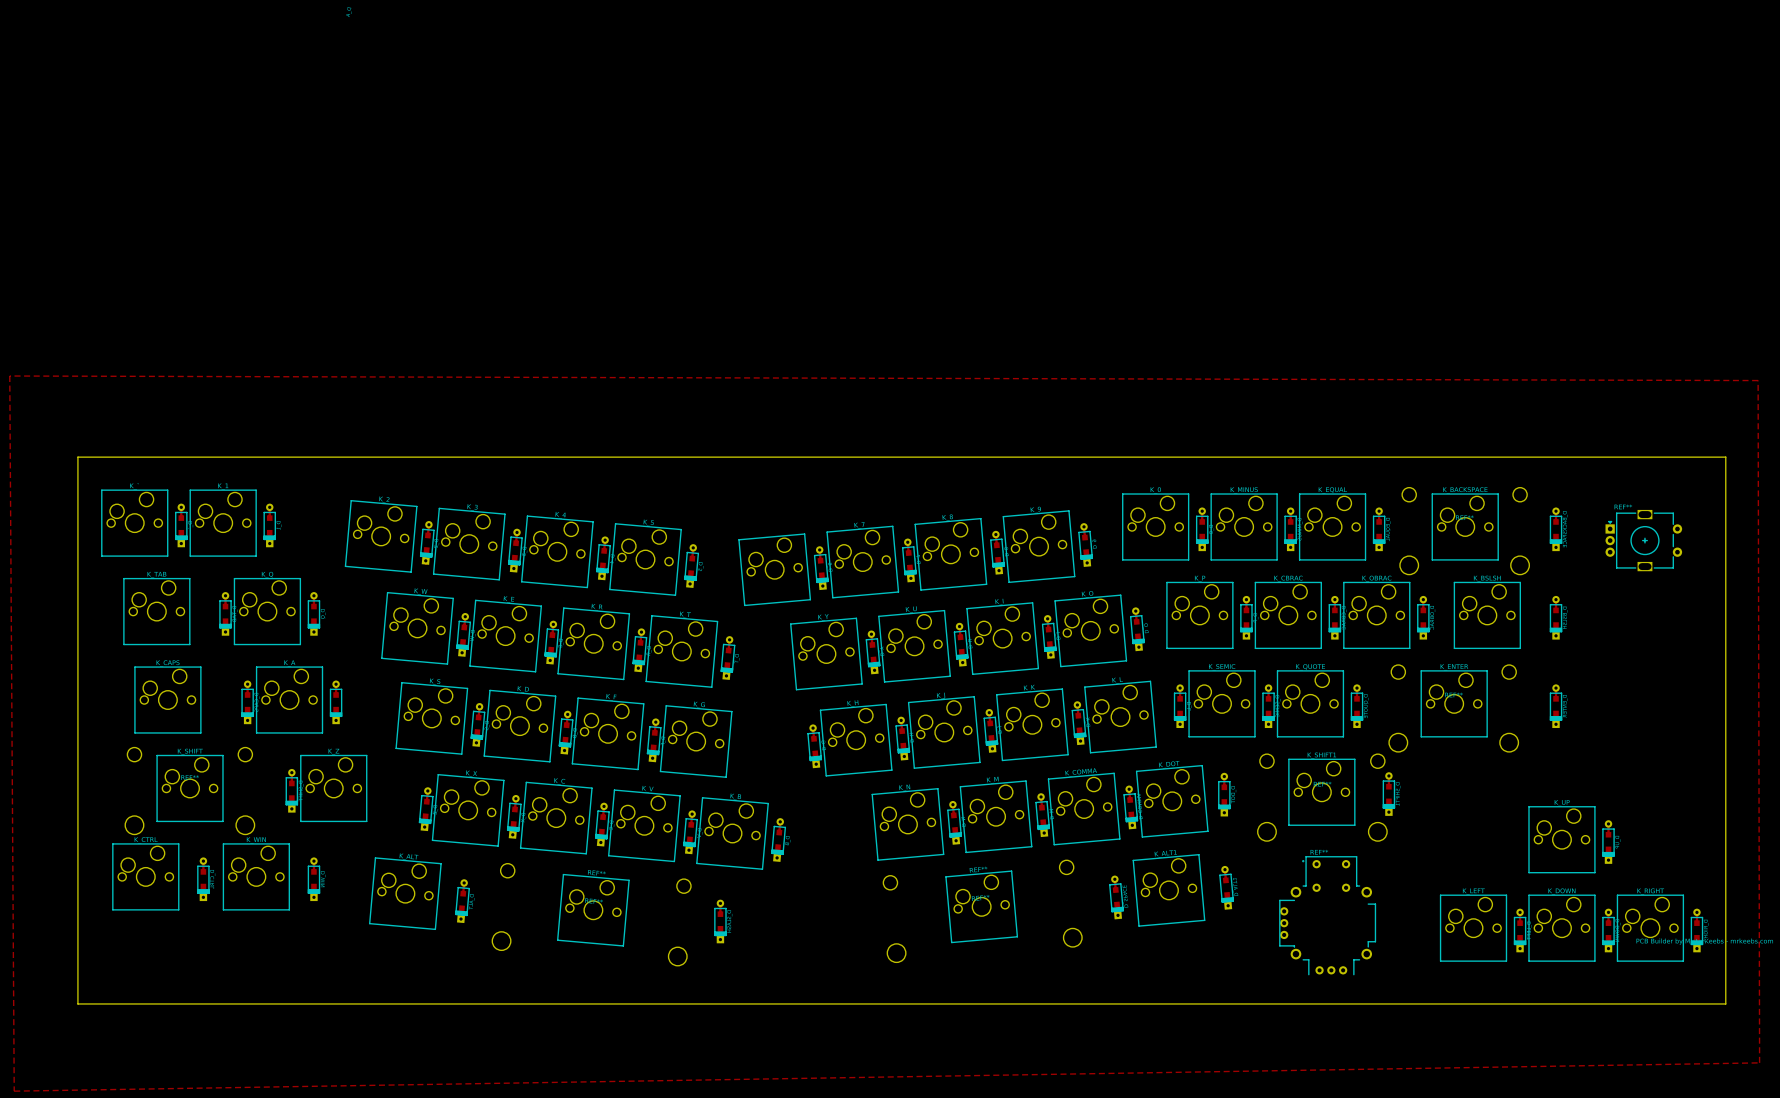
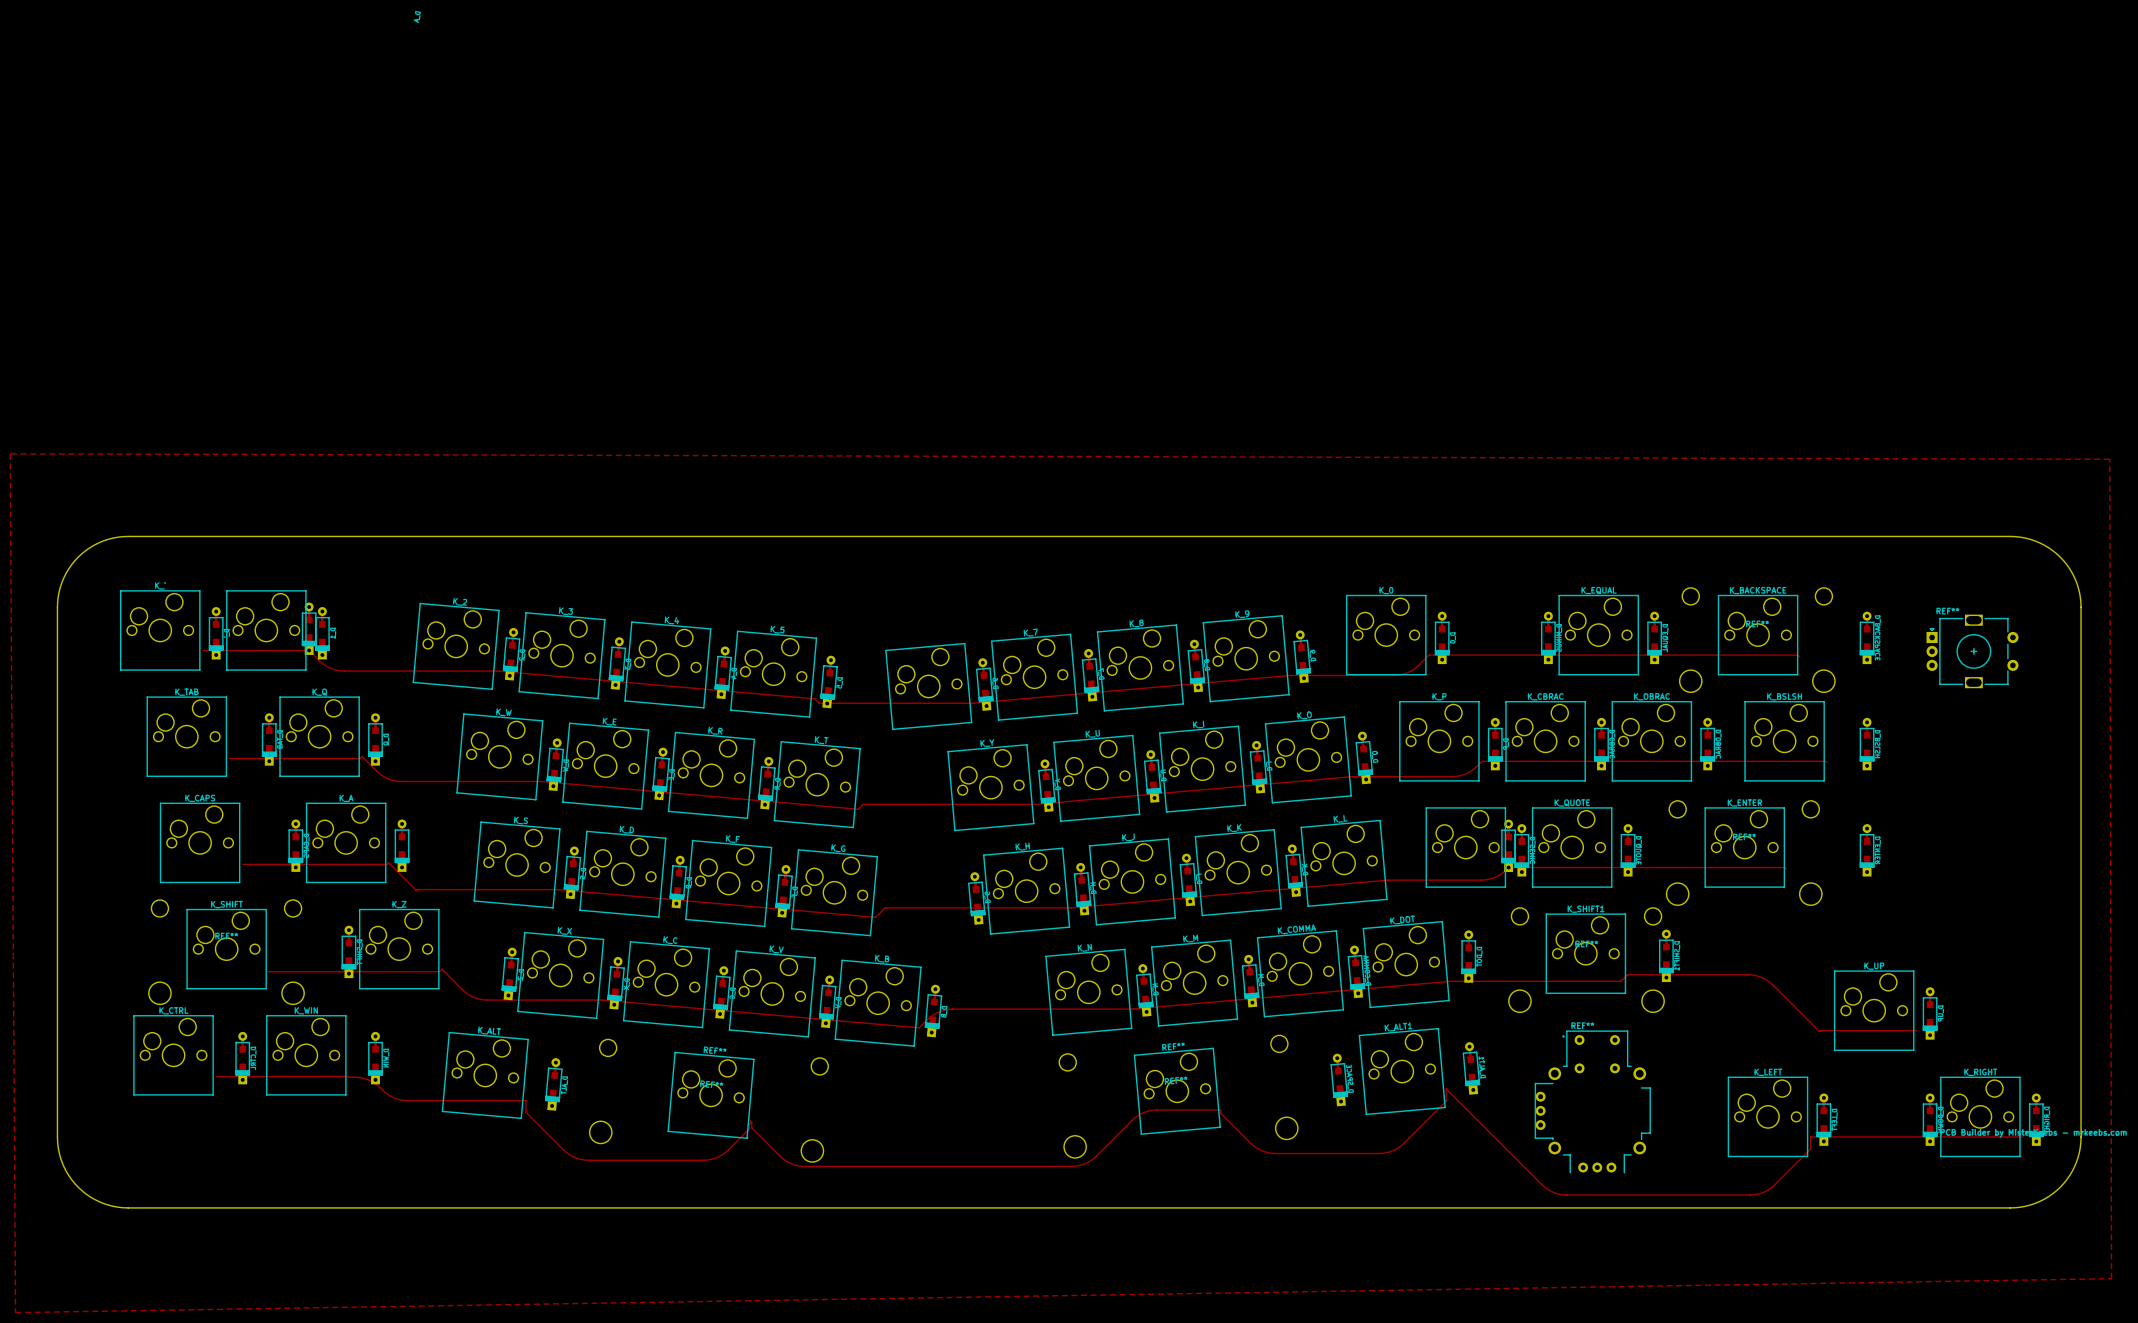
part: (223, 523) -> none
part: none -> (271, 630)
part: (1244, 526) -> none
track: none -> (202, 650) (309, 650) (324, 665) (340, 670) (497, 671) (814, 698) (819, 703) (972, 703) (1290, 675) (1397, 675) (1413, 669) (1428, 655) (1797, 655) (1799, 656)
track: none -> (229, 758) (360, 758) (362, 756) (382, 775) (398, 781) (540, 781) (858, 809) (863, 804) (1035, 804) (1352, 776) (1455, 776) (1468, 772) (1482, 761) (1826, 762)
part: (727, 658) -> none
part: (1222, 703) -> none
part: none -> (1470, 847)
part: (1180, 706) -> none
track: none -> (242, 864) (388, 862) (415, 890) (558, 889) (875, 917) (885, 907) (1070, 907) (1388, 880) (1484, 879) (1498, 875) (1508, 867) (1784, 867) (1786, 869)
track: none -> (268, 971) (439, 971) (441, 969) (467, 994) (484, 999) (601, 1000) (919, 1027) (933, 1015) (949, 1009) (1132, 1009) (1450, 981) (1621, 981) (1627, 974) (1748, 974) (1761, 977) (1770, 982) (1819, 1031) (1916, 1030)
track: none -> (216, 1076) (348, 1076) (368, 1079) (391, 1096) (404, 1100) (526, 1100) (526, 1112) (566, 1152) (575, 1157) (585, 1160) (710, 1159) (725, 1152) (749, 1128) (751, 1122)
part: (720, 921) -> none
part: (1561, 928) -> none
track: none -> (749, 1120) (751, 1122)
track: none -> (751, 1122) (751, 1127) (782, 1158) (791, 1163) (801, 1166) (1078, 1165) (1093, 1158) (1137, 1115) (1146, 1111) (1157, 1109) (1220, 1109) (1220, 1113) (1253, 1145) (1268, 1152) (1379, 1153) (1392, 1150) (1404, 1143) (1446, 1101) (1446, 1088) (1544, 1187) (1553, 1192) (1567, 1195) (1756, 1194) (1772, 1187) (1810, 1148) (1810, 1136) (2023, 1136)
board edge: (108, 1003) (77, 1003) (77, 457) (1725, 457) (1725, 1003) (1675, 1003) -> (128, 1207) (103, 1203) (89, 1196) (78, 1187) (63, 1166) (59, 1152) (57, 1137) (58, 597) (66, 573) (81, 553) (103, 540) (128, 536) (2010, 536) (2034, 540) (2052, 550) (2066, 564) (2076, 582) (2080, 602) (2080, 1142) (2074, 1166) (2060, 1187) (2039, 1201) (2025, 1206) (2010, 1207)

